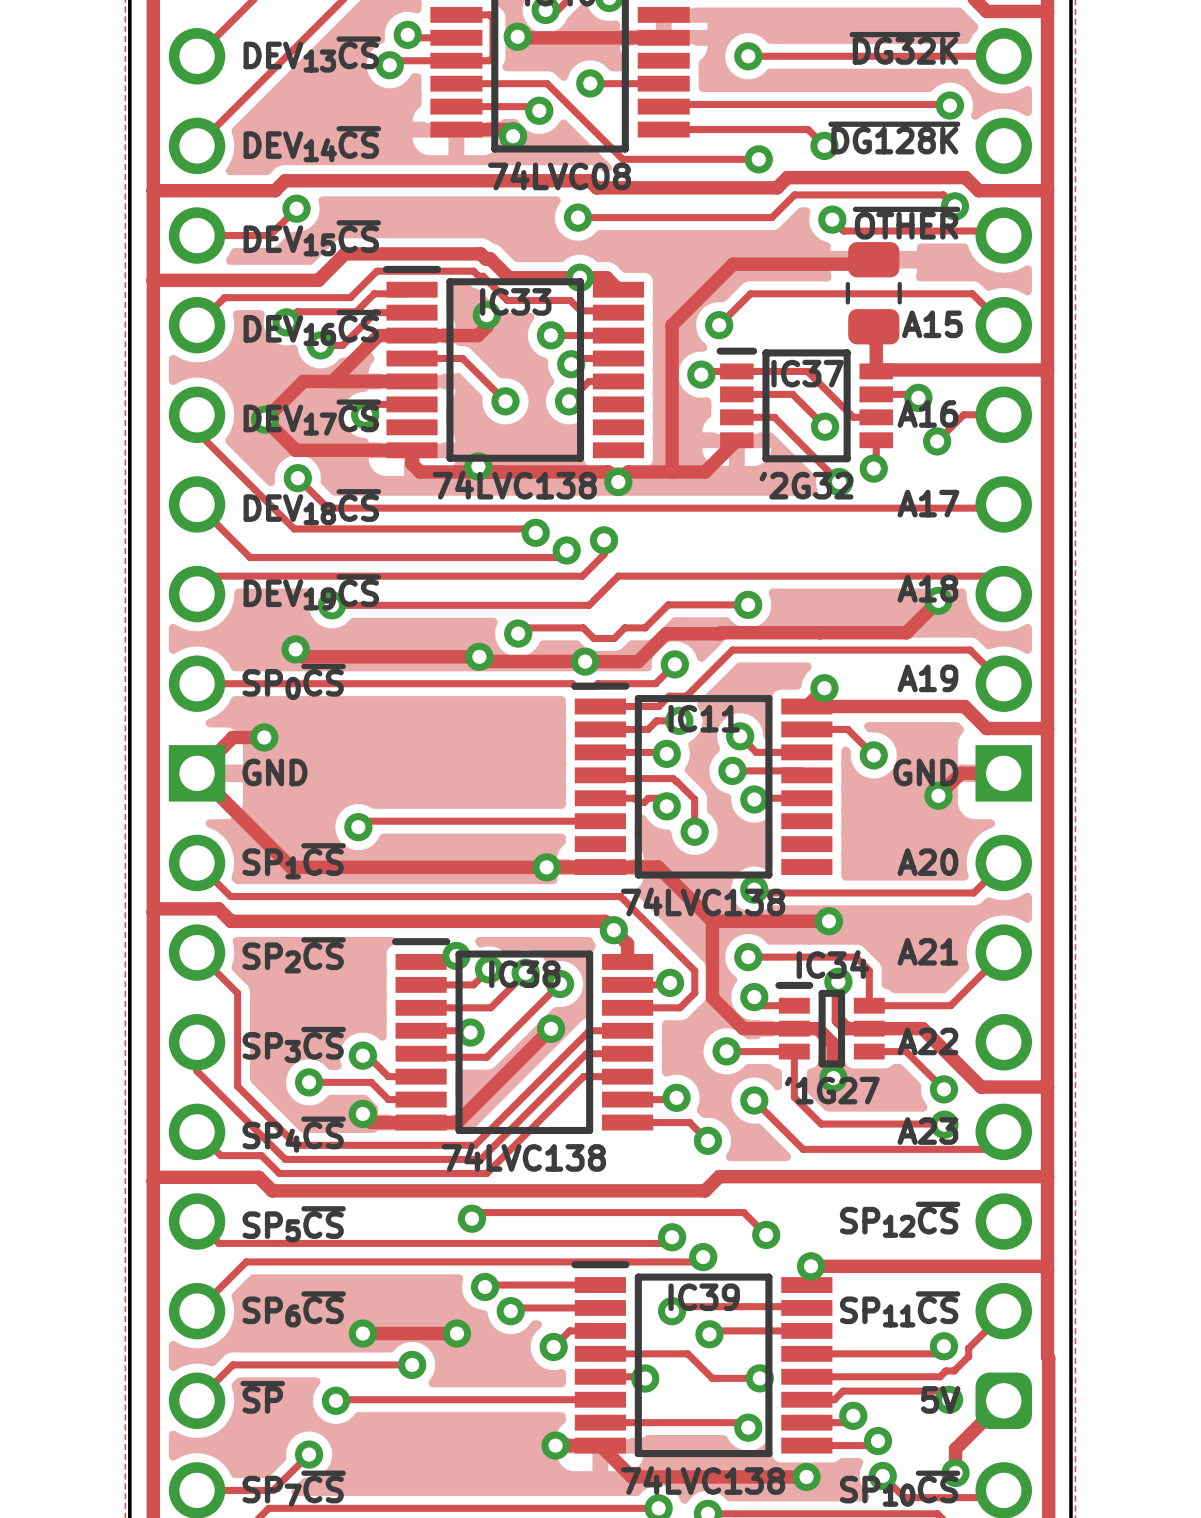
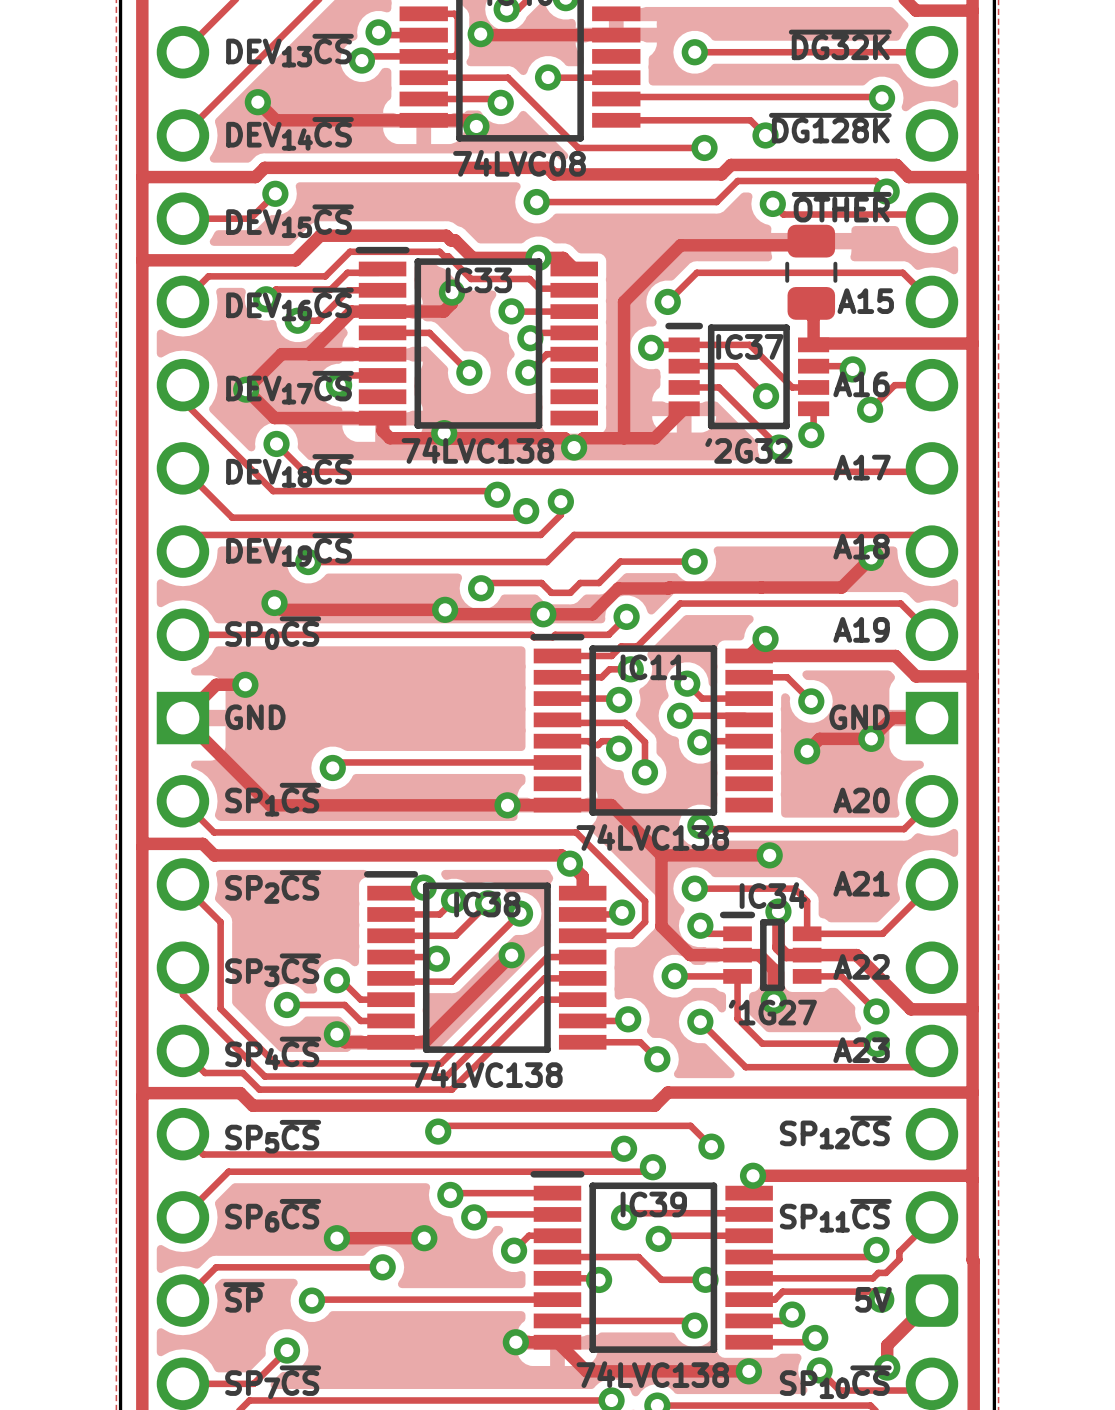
track: none -> (257, 102) (275, 120) (423, 120)
via: none -> (257, 102)
track: none -> (871, 738) (819, 738) (807, 751)
via: none -> (807, 751)

